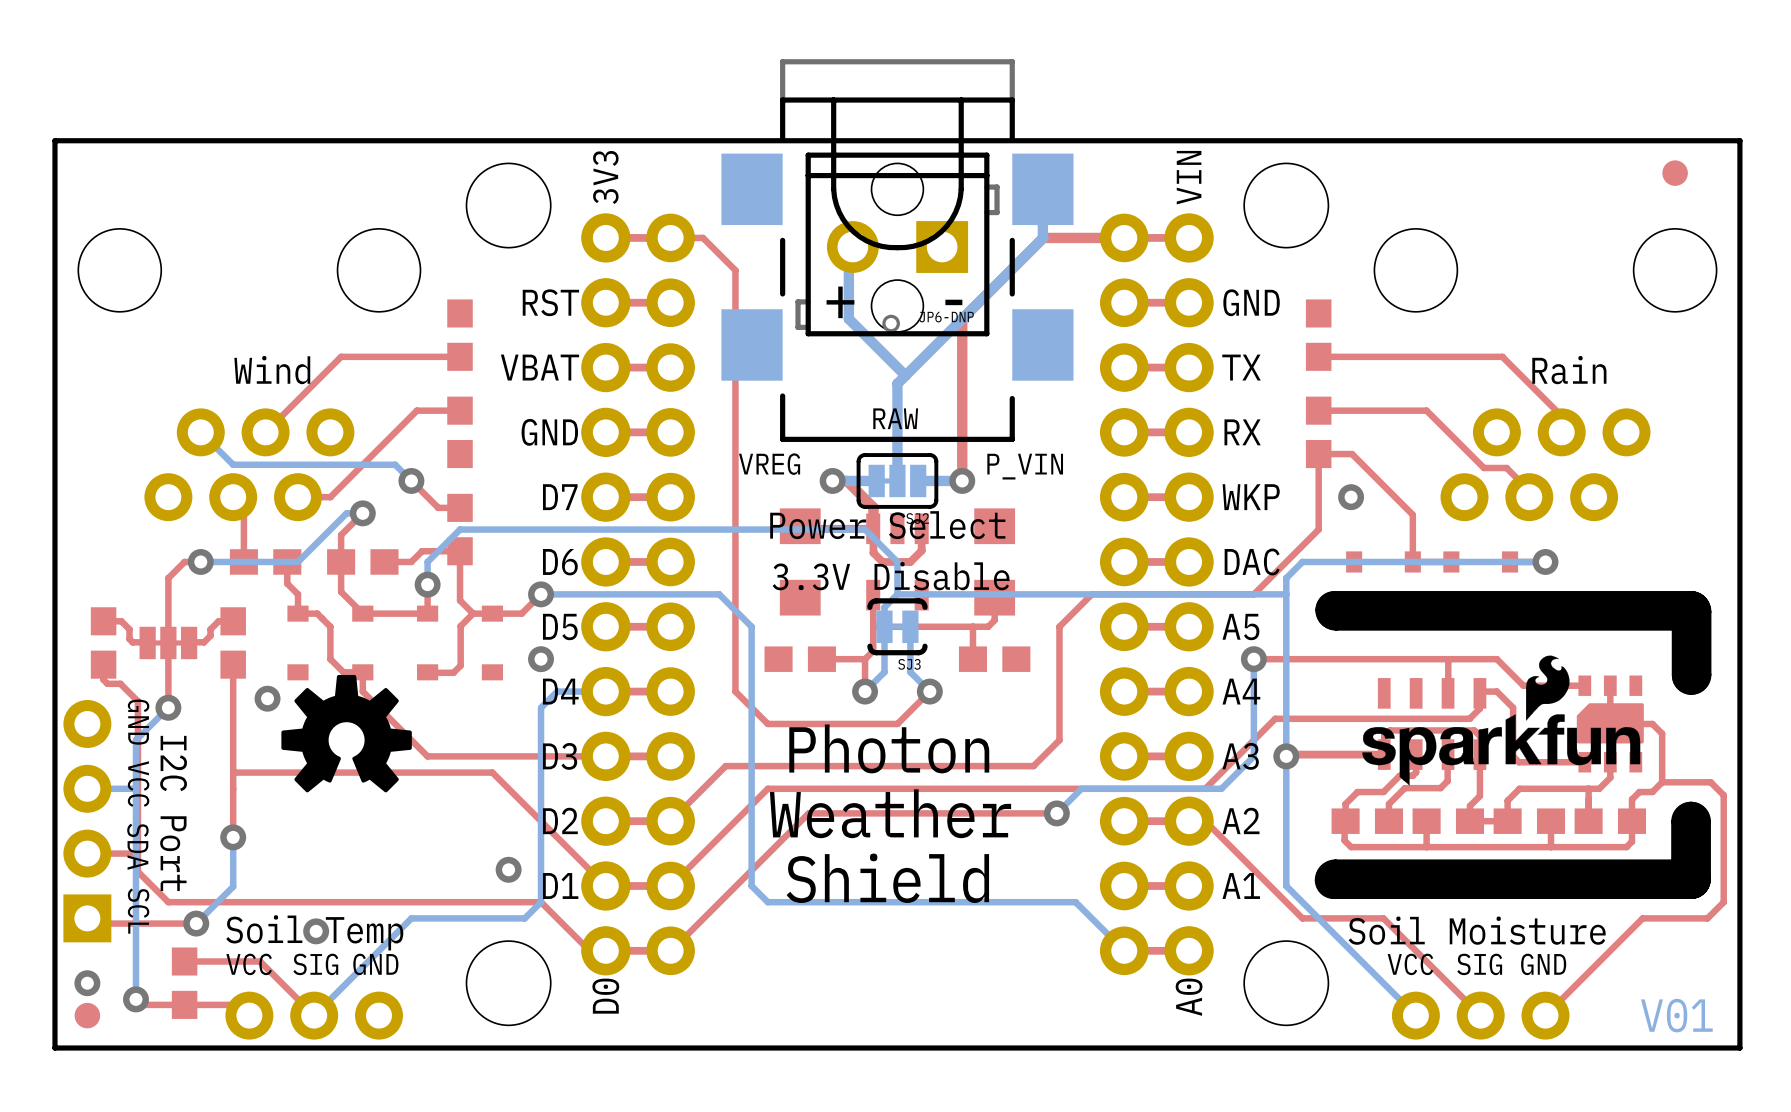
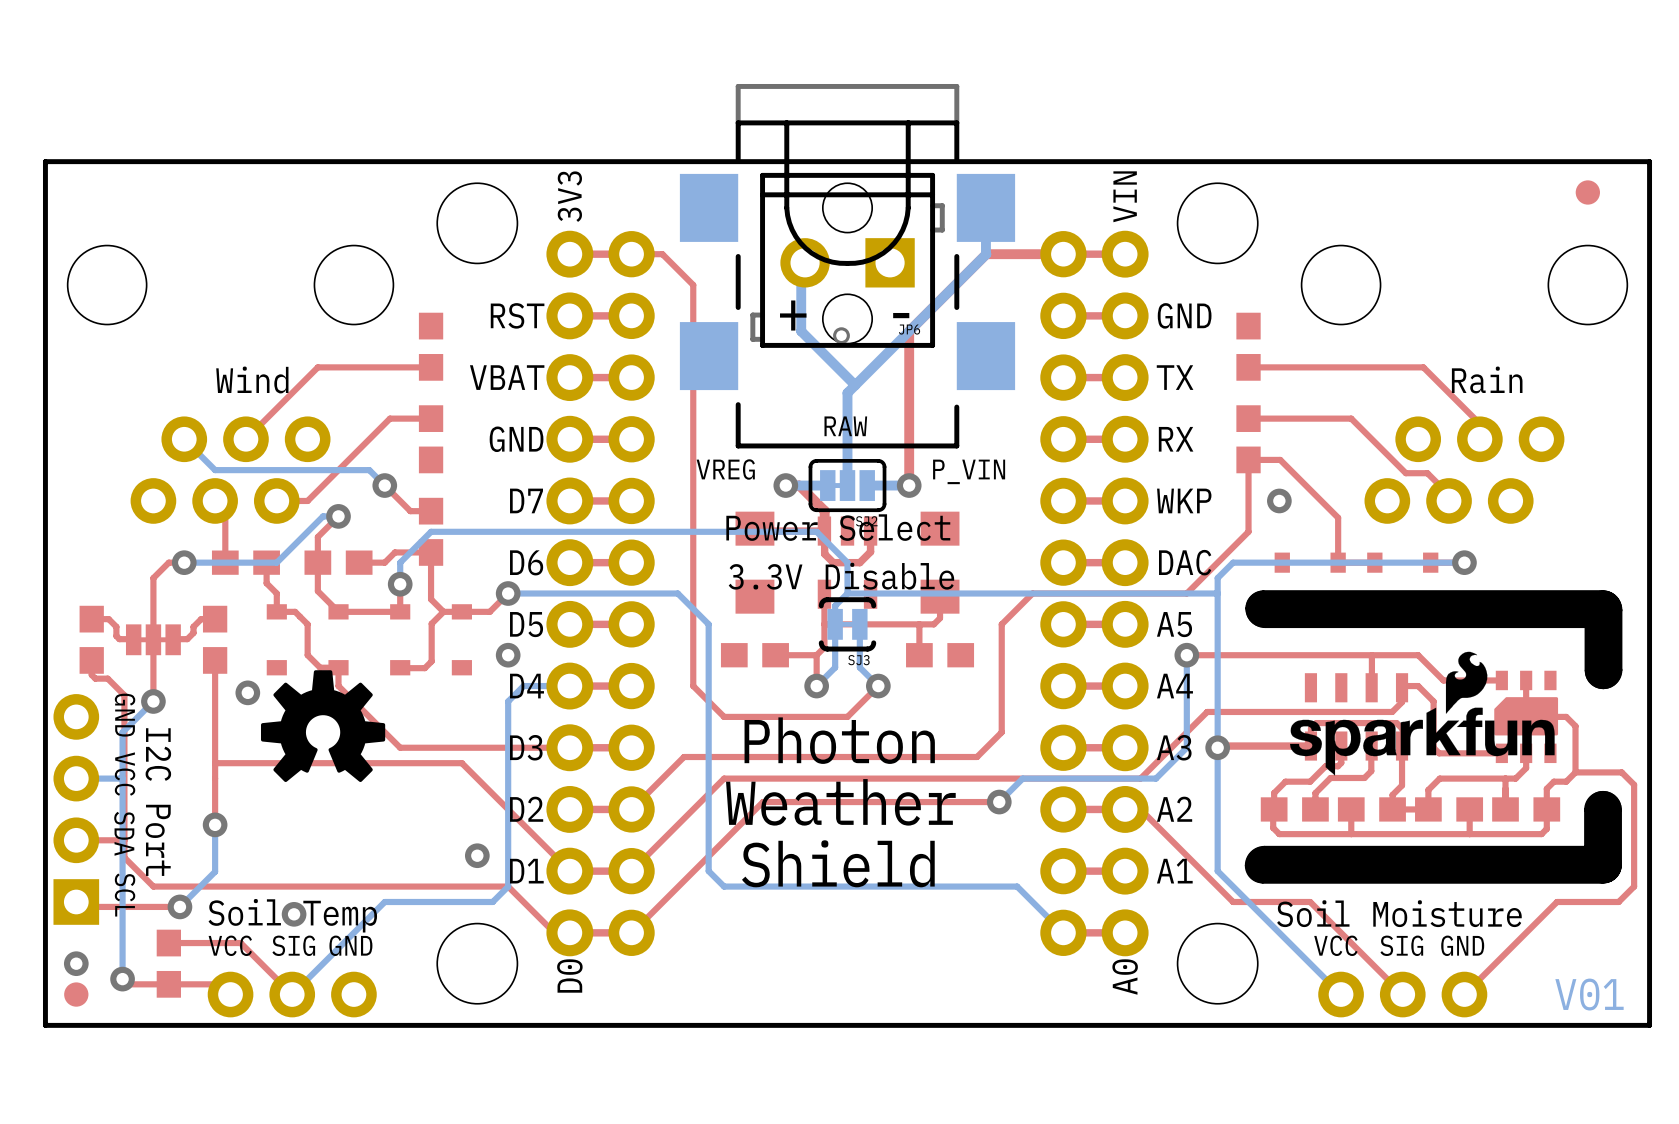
JP6-DNP name: JP6-DNP (946, 317) -> JP6 (909, 329)

